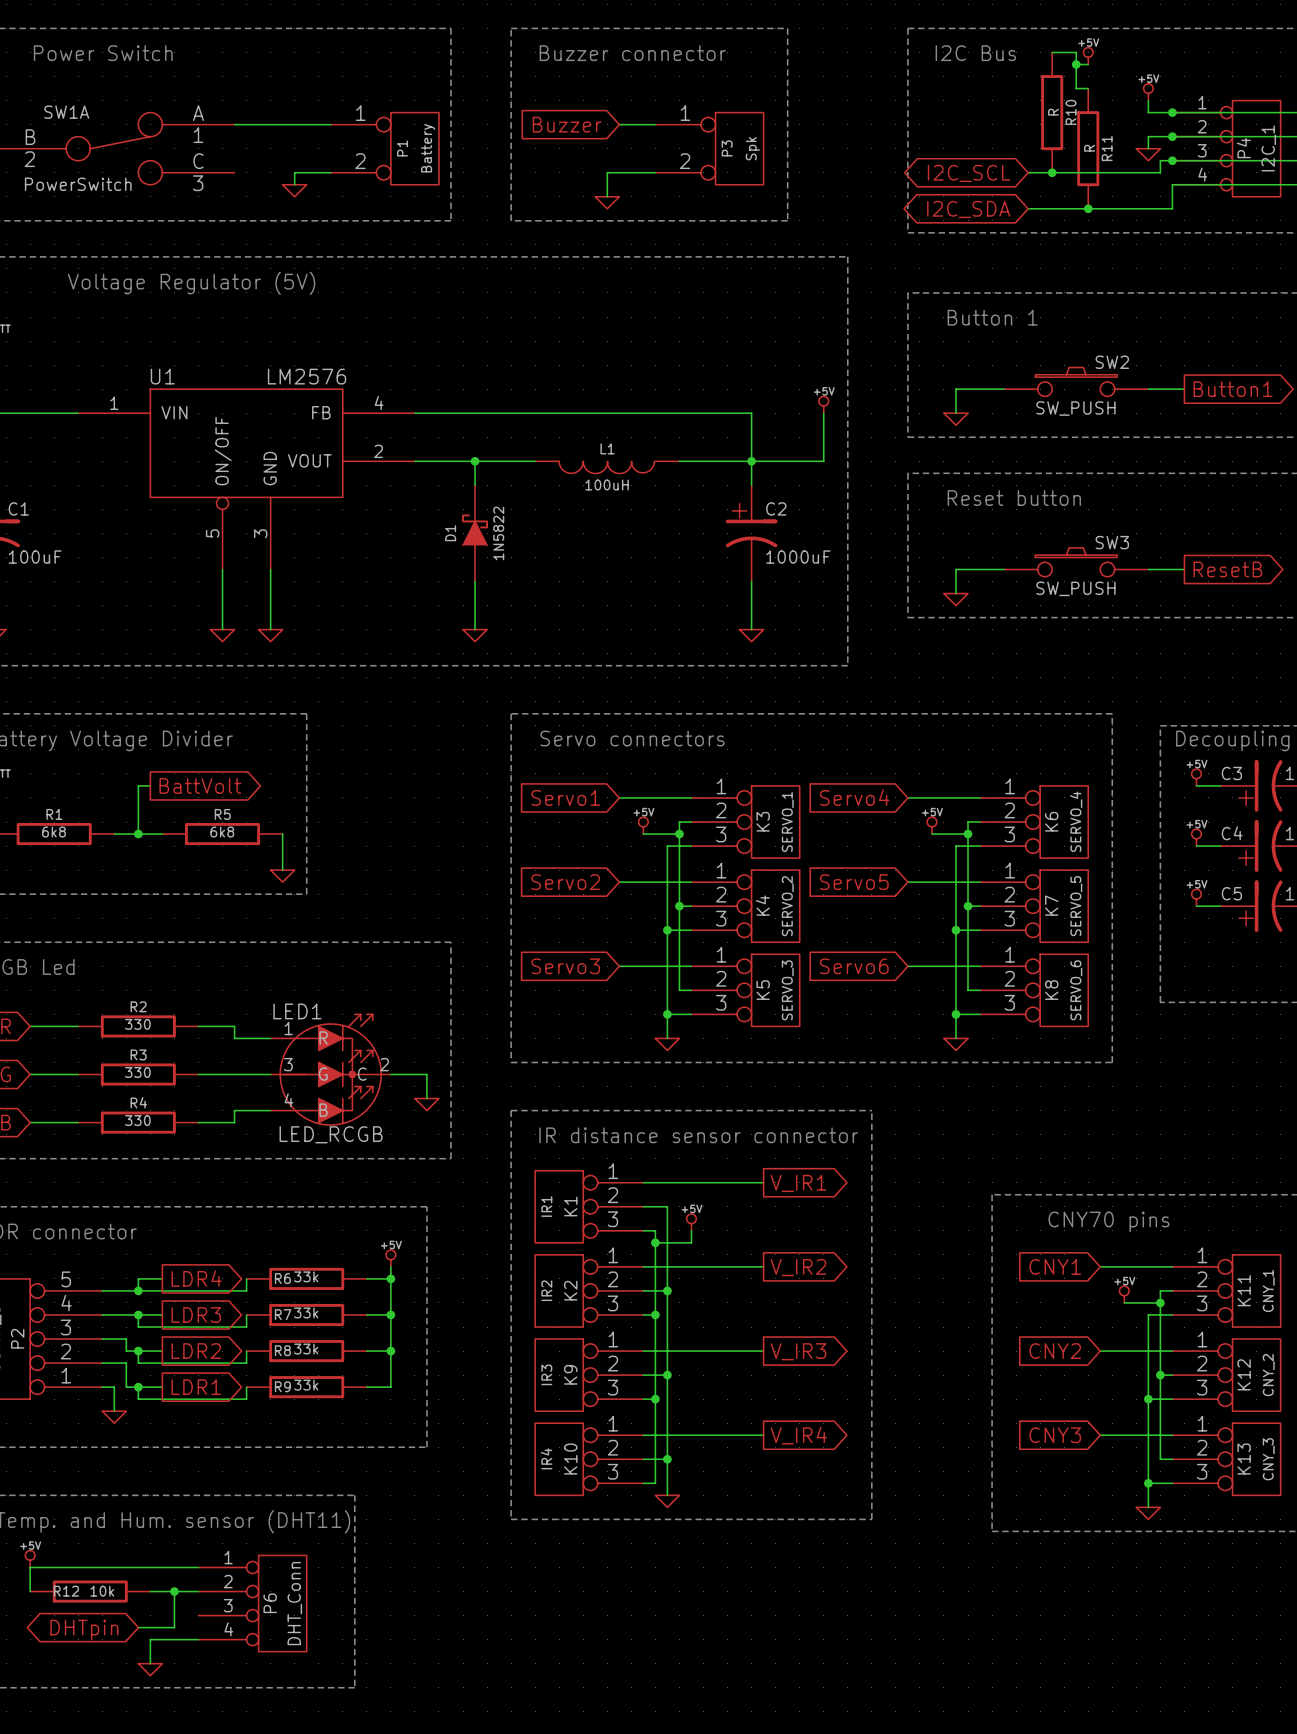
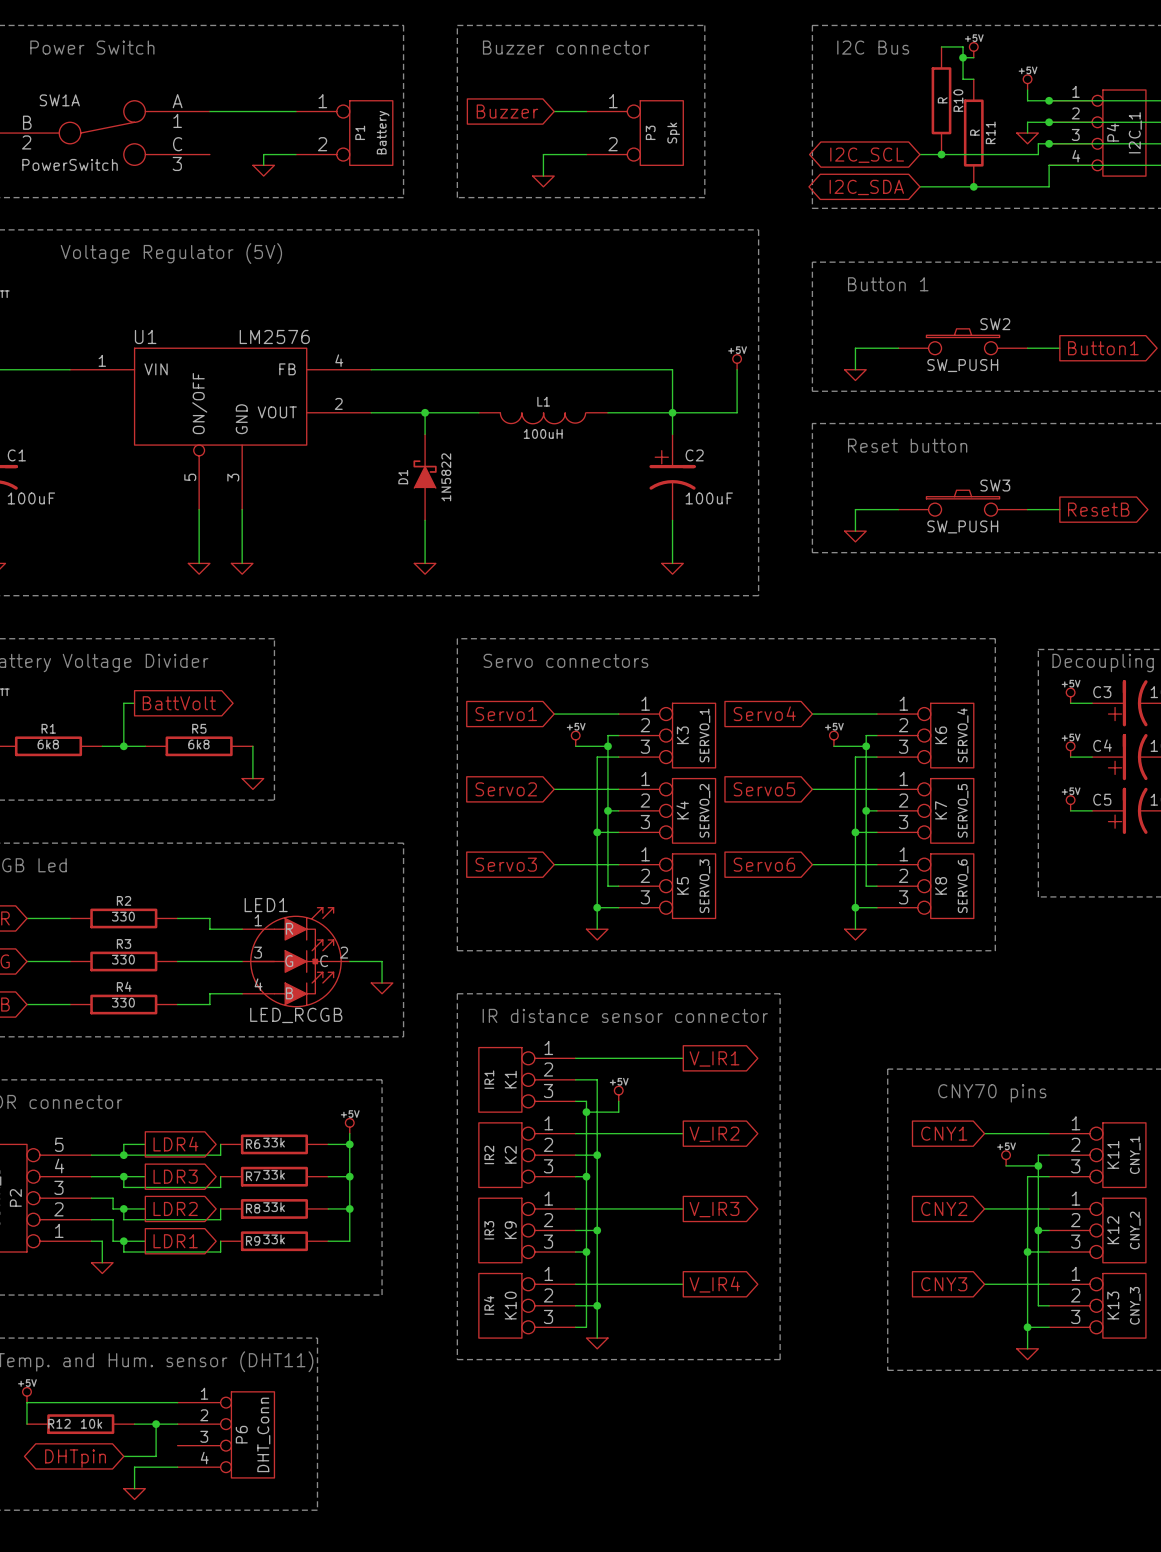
C2 value: 1000uF (798, 557) -> 100uF (709, 498)

